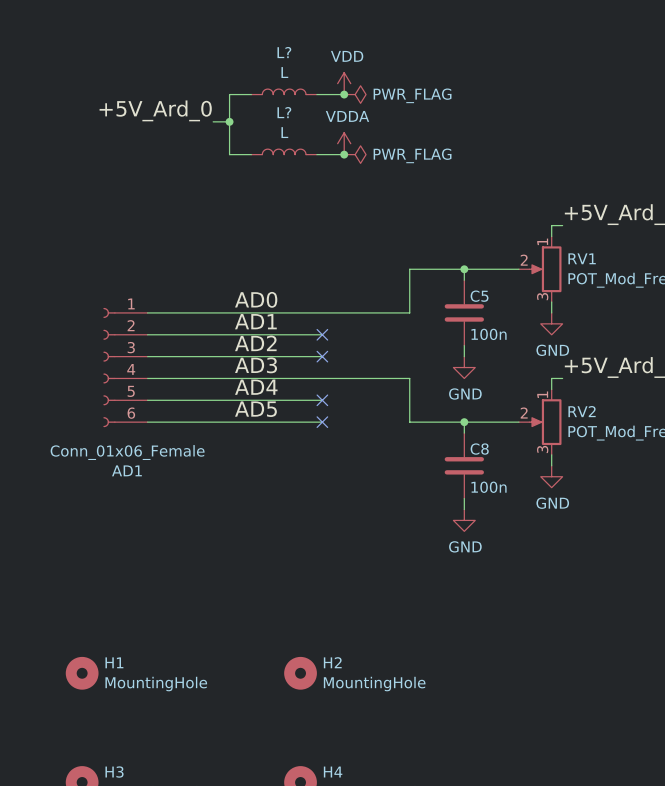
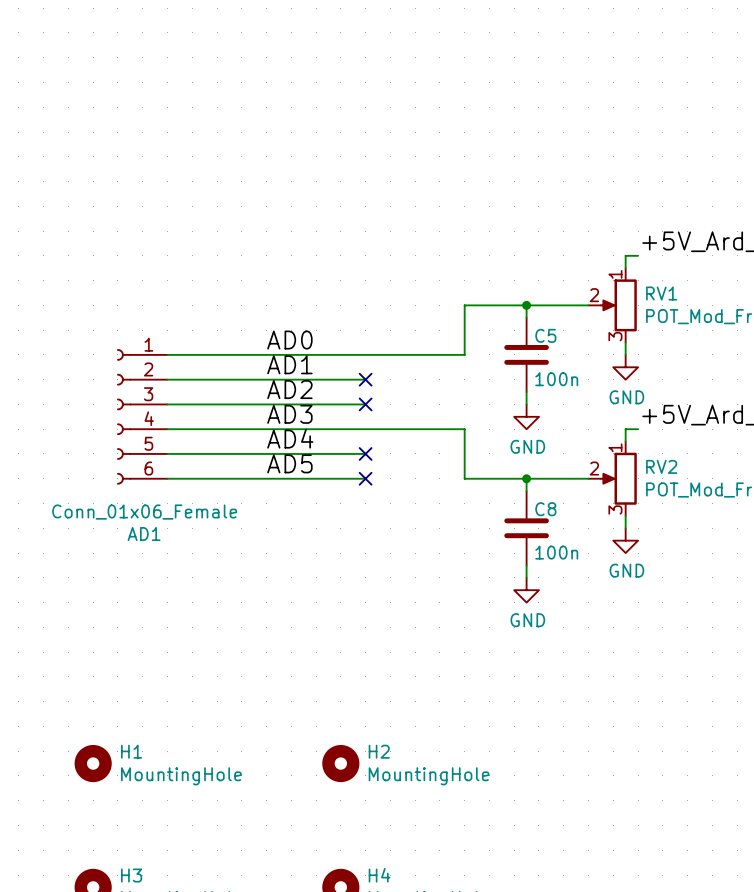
power symbol: VDD (344, 83) -> none
L?: L (284, 91) -> none
wire: (251, 94) (229, 94) (229, 154) (251, 154) -> none
wire: (316, 94) (344, 94) -> none
junction: (344, 94) -> none
power symbol: PWR_FLAG (355, 94) -> none
label: +5V_Ard_0 (155, 110) -> none
wire: (213, 121) (229, 121) -> none
junction: (229, 121) -> none
power symbol: VDDA (344, 143) -> none
L?: L (284, 151) -> none
wire: (316, 154) (344, 154) -> none
junction: (344, 154) -> none
power symbol: PWR_FLAG (355, 154) -> none

